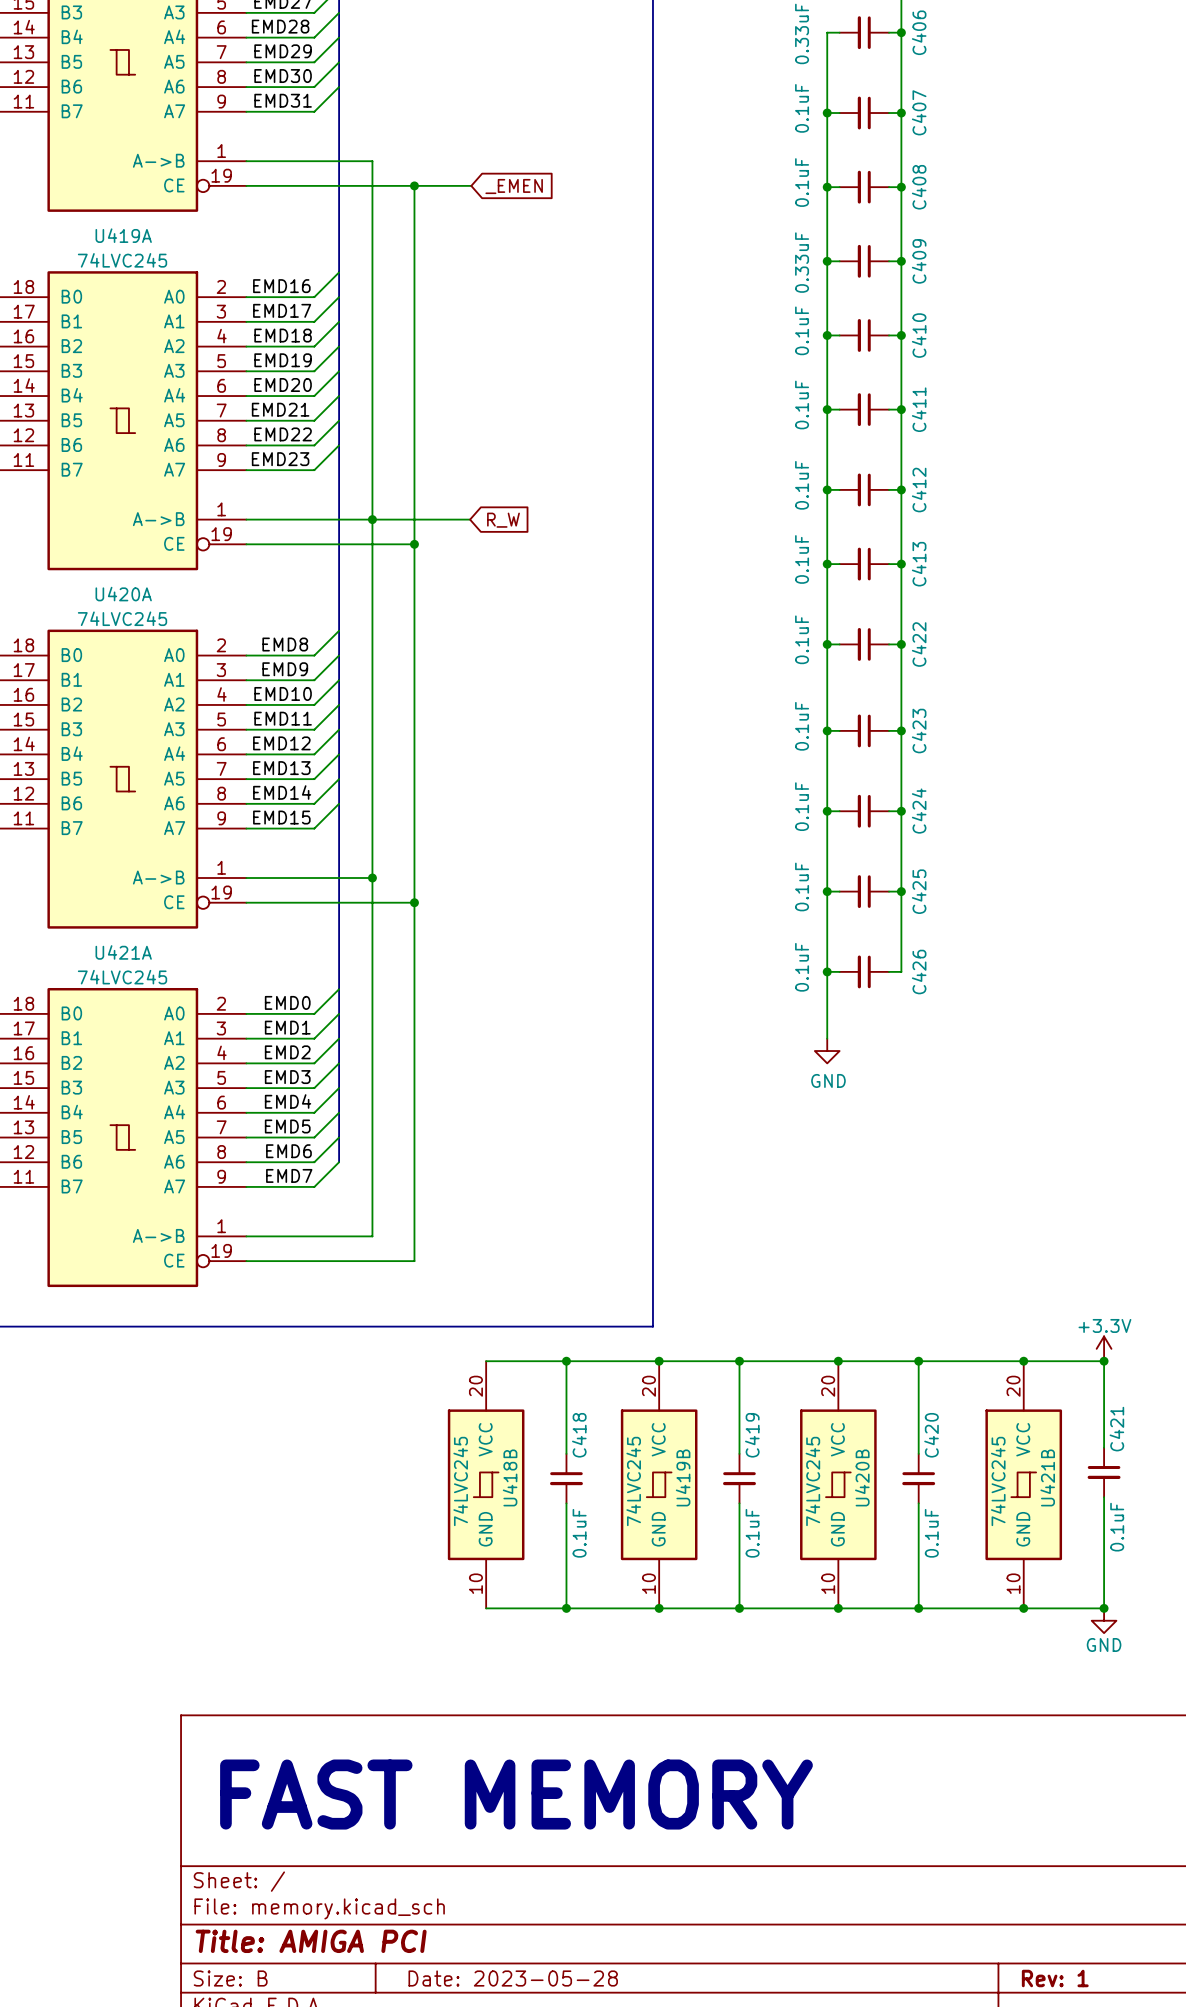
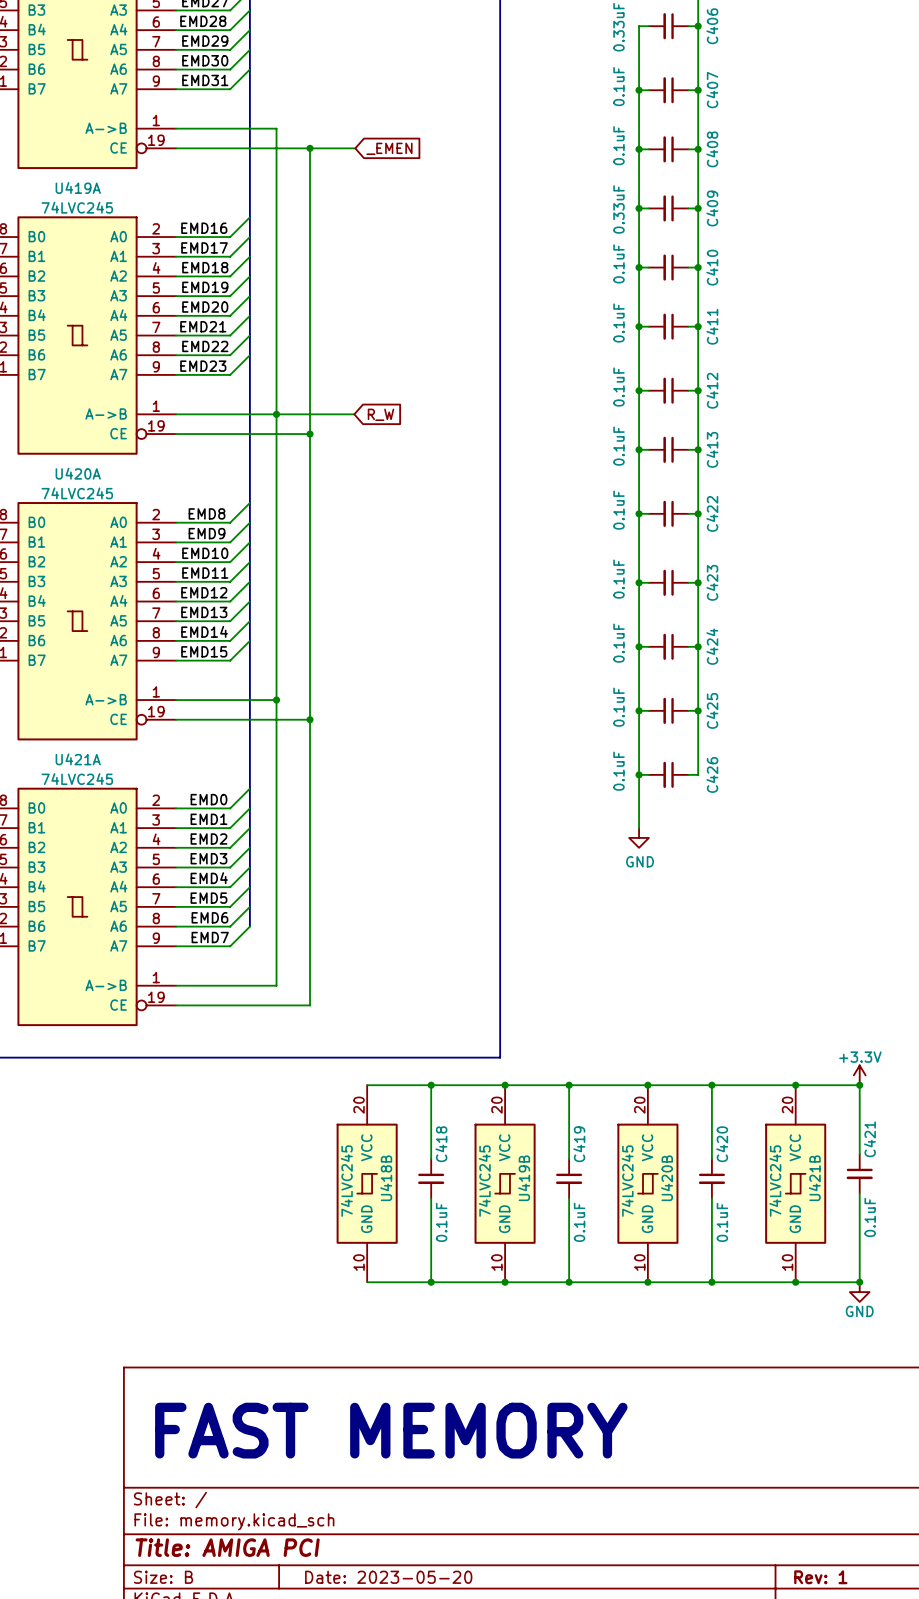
title block: Date: 2023-05-28 (513, 1978) -> Date: 2023-05-20 (388, 1577)

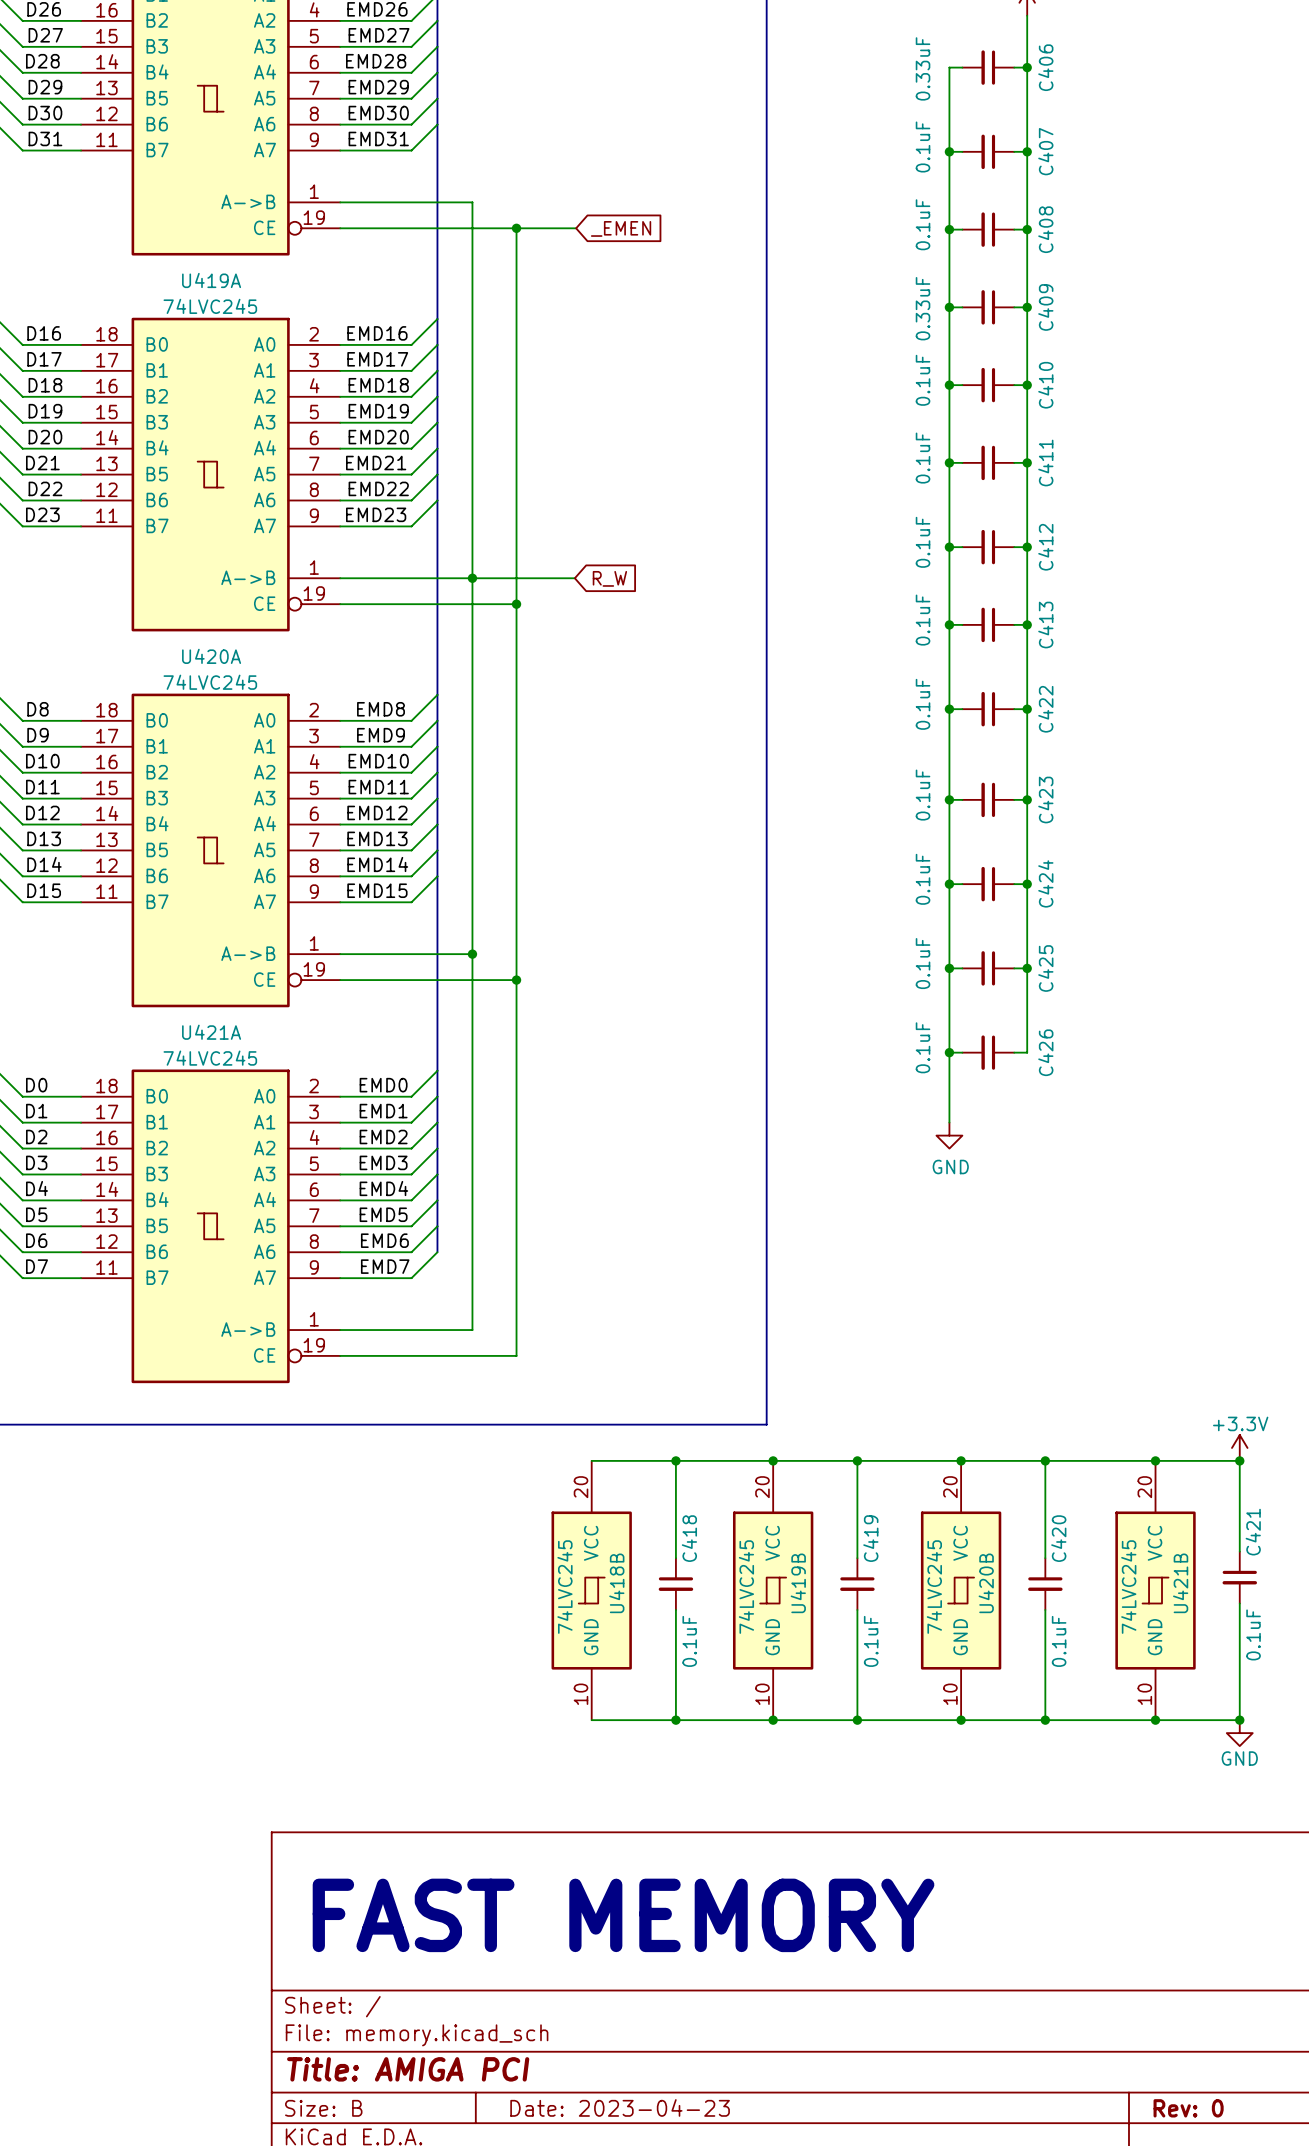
title block: Date: 2023-05-20 (388, 1577) -> Date: 2023-04-23 (620, 2107)
title block: Rev: 1 (820, 1577) -> Rev: 0 (1188, 2108)

